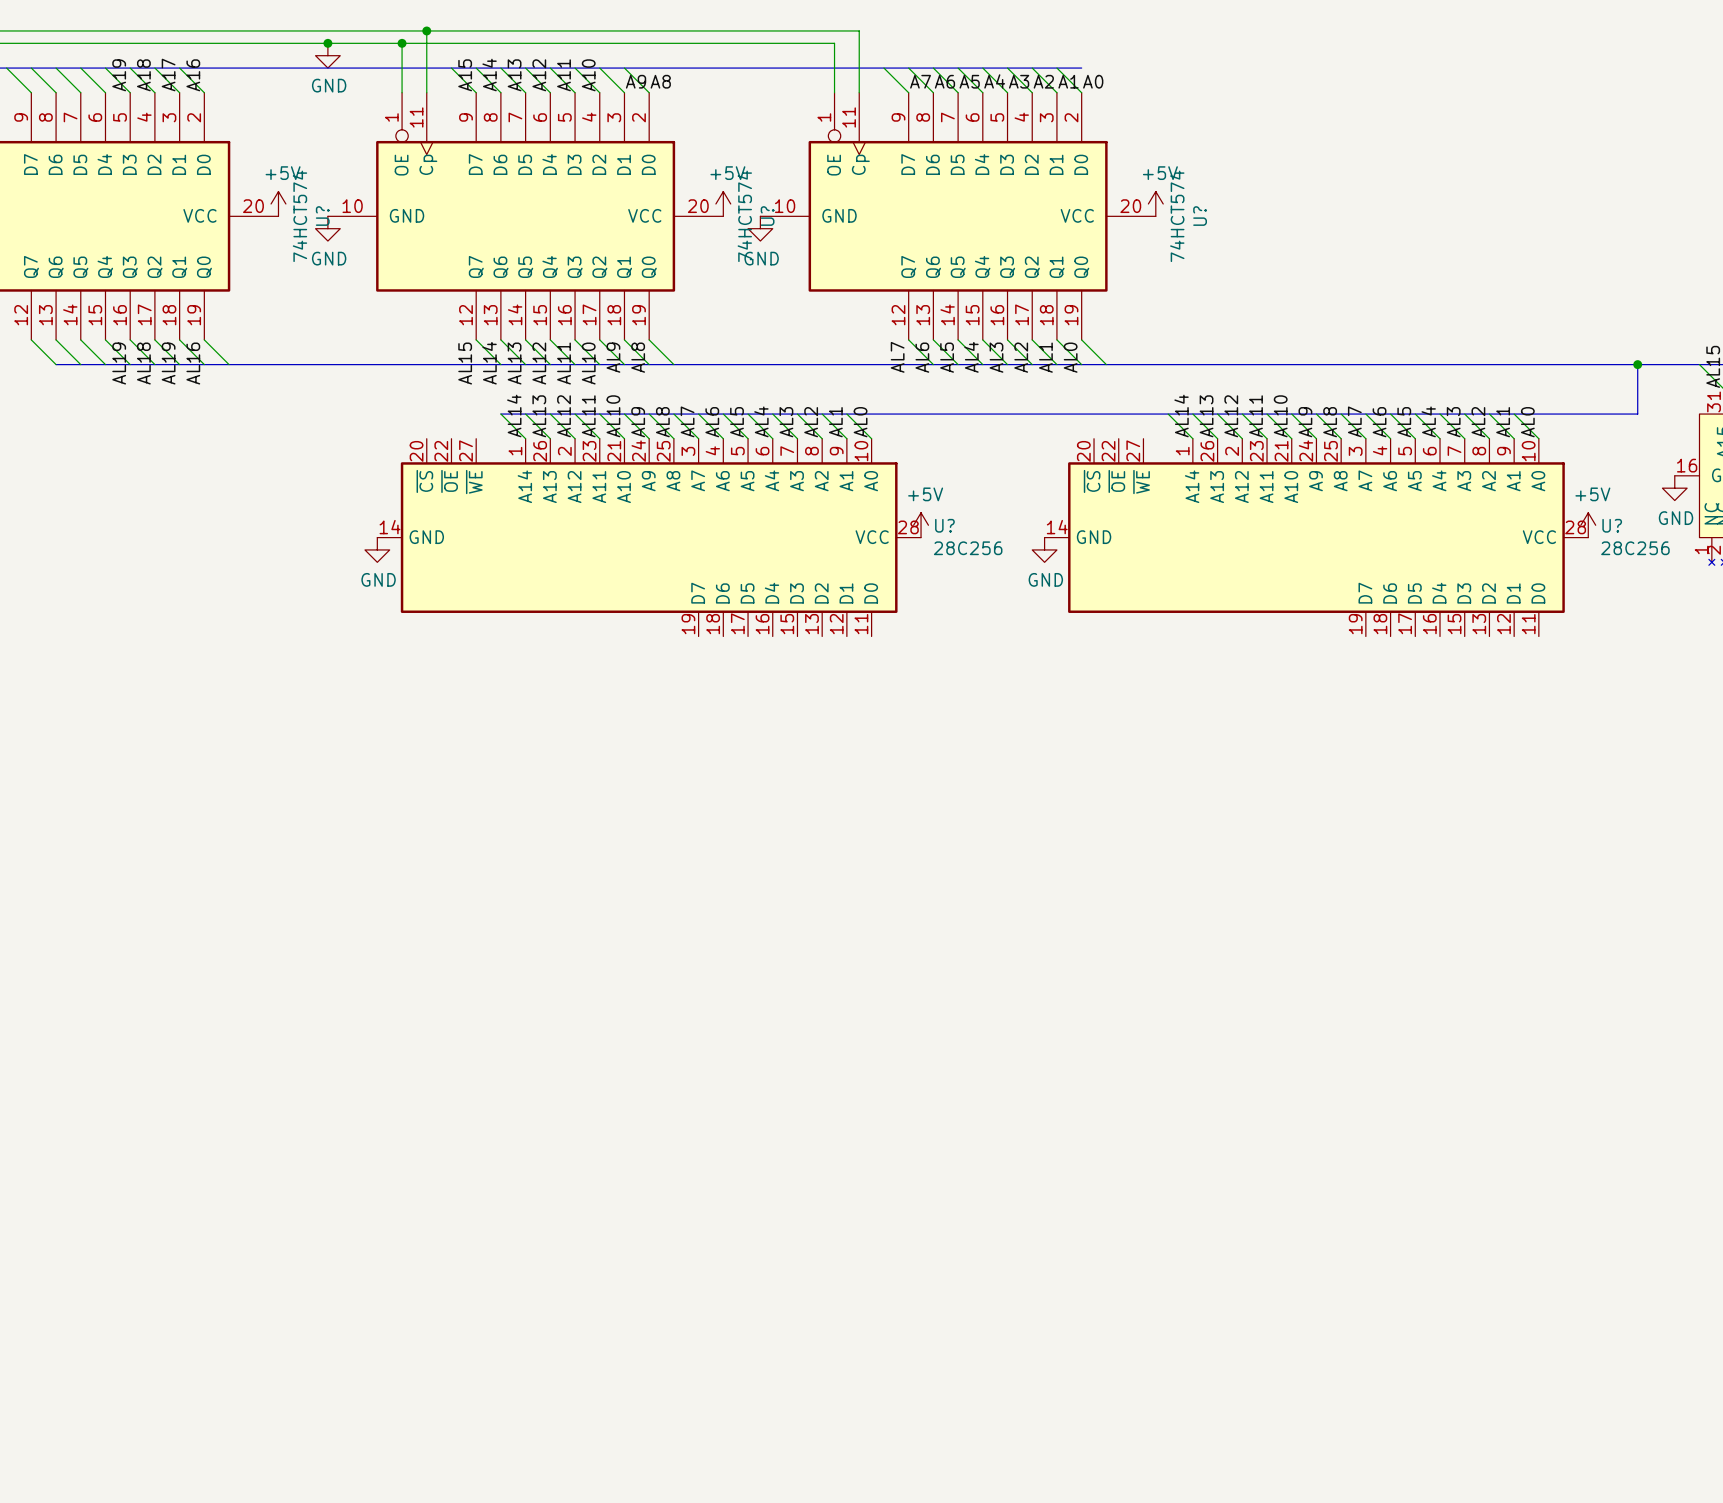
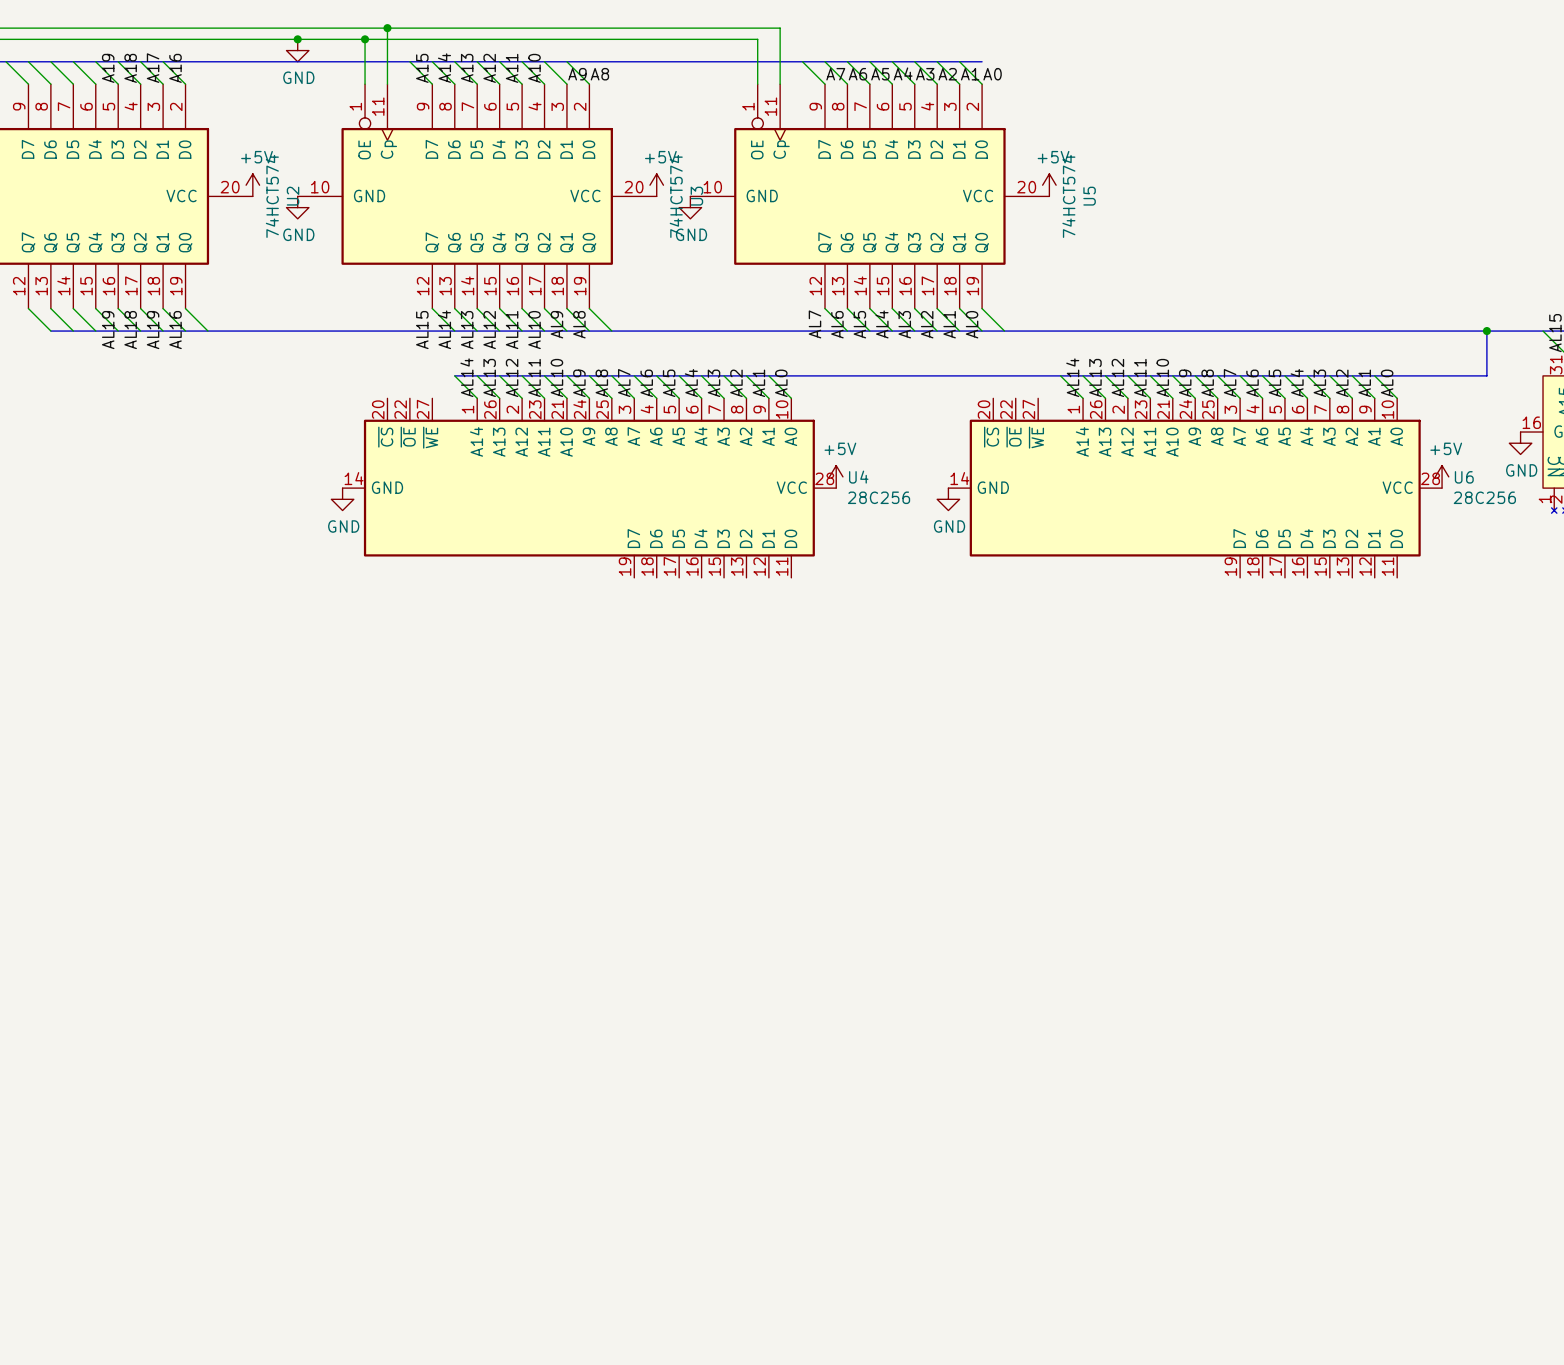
U? name: U? (322, 216) -> U2 (293, 196)
U? name: U? (767, 216) -> U3 (696, 196)
U? name: U? (1200, 216) -> U5 (1089, 196)
U? name: U? (944, 525) -> U4 (858, 477)
U? name: U? (1612, 525) -> U6 (1464, 477)

